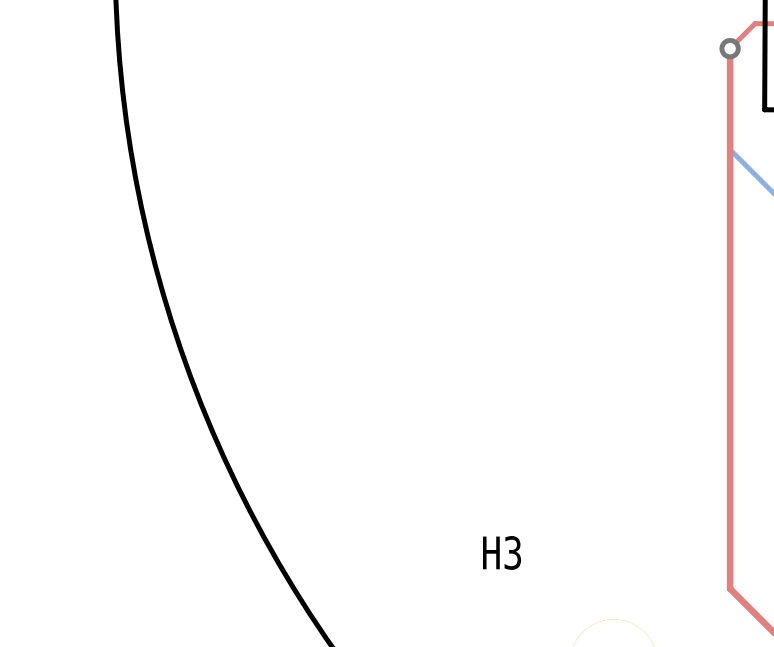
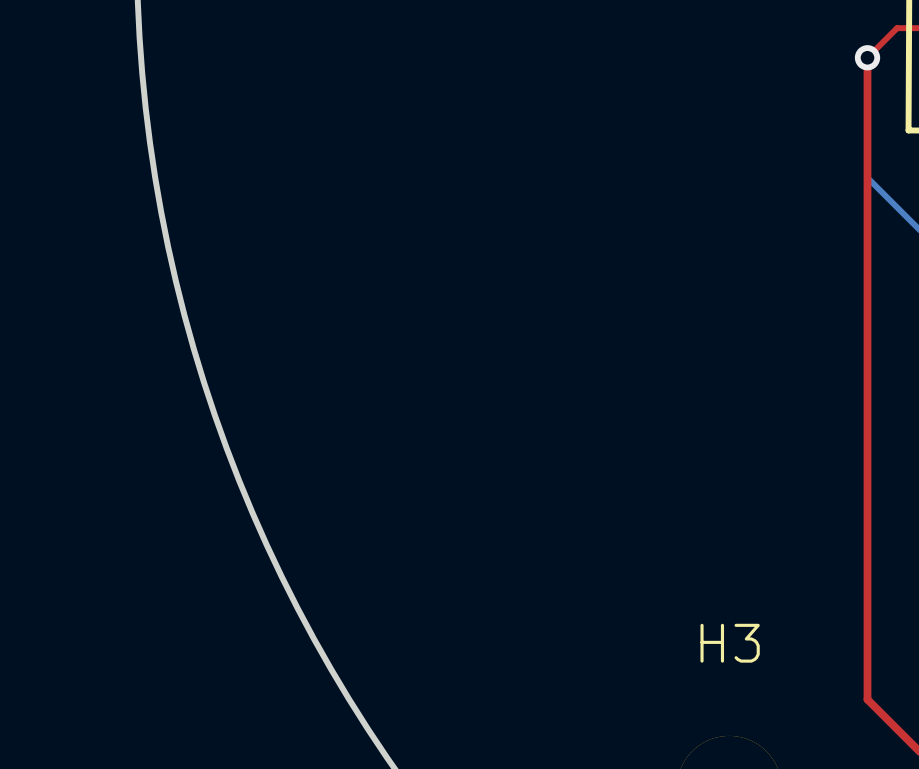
H3 name position: H3 (502, 552) -> H3 (730, 643)

